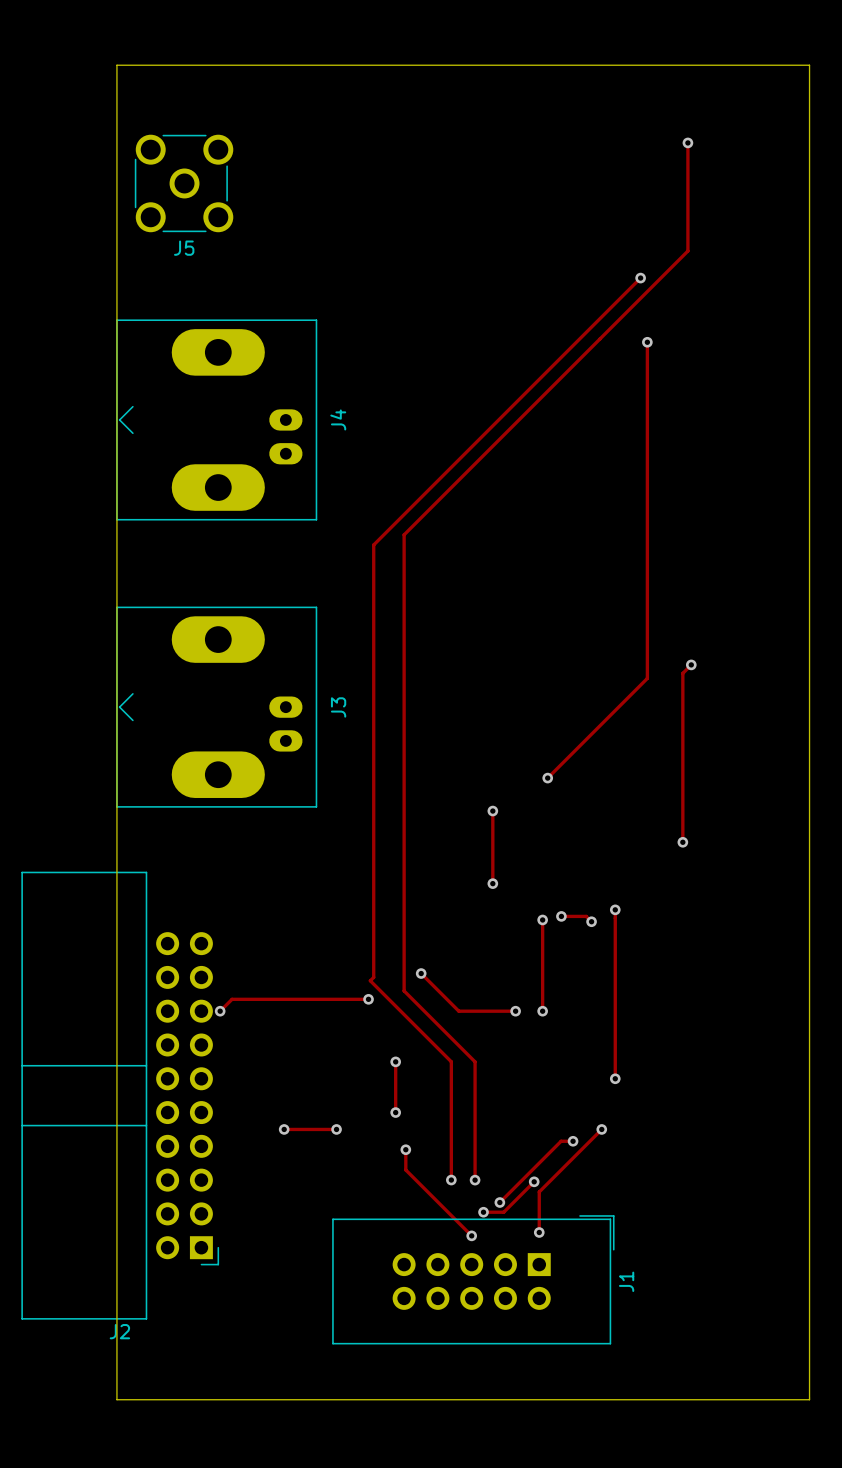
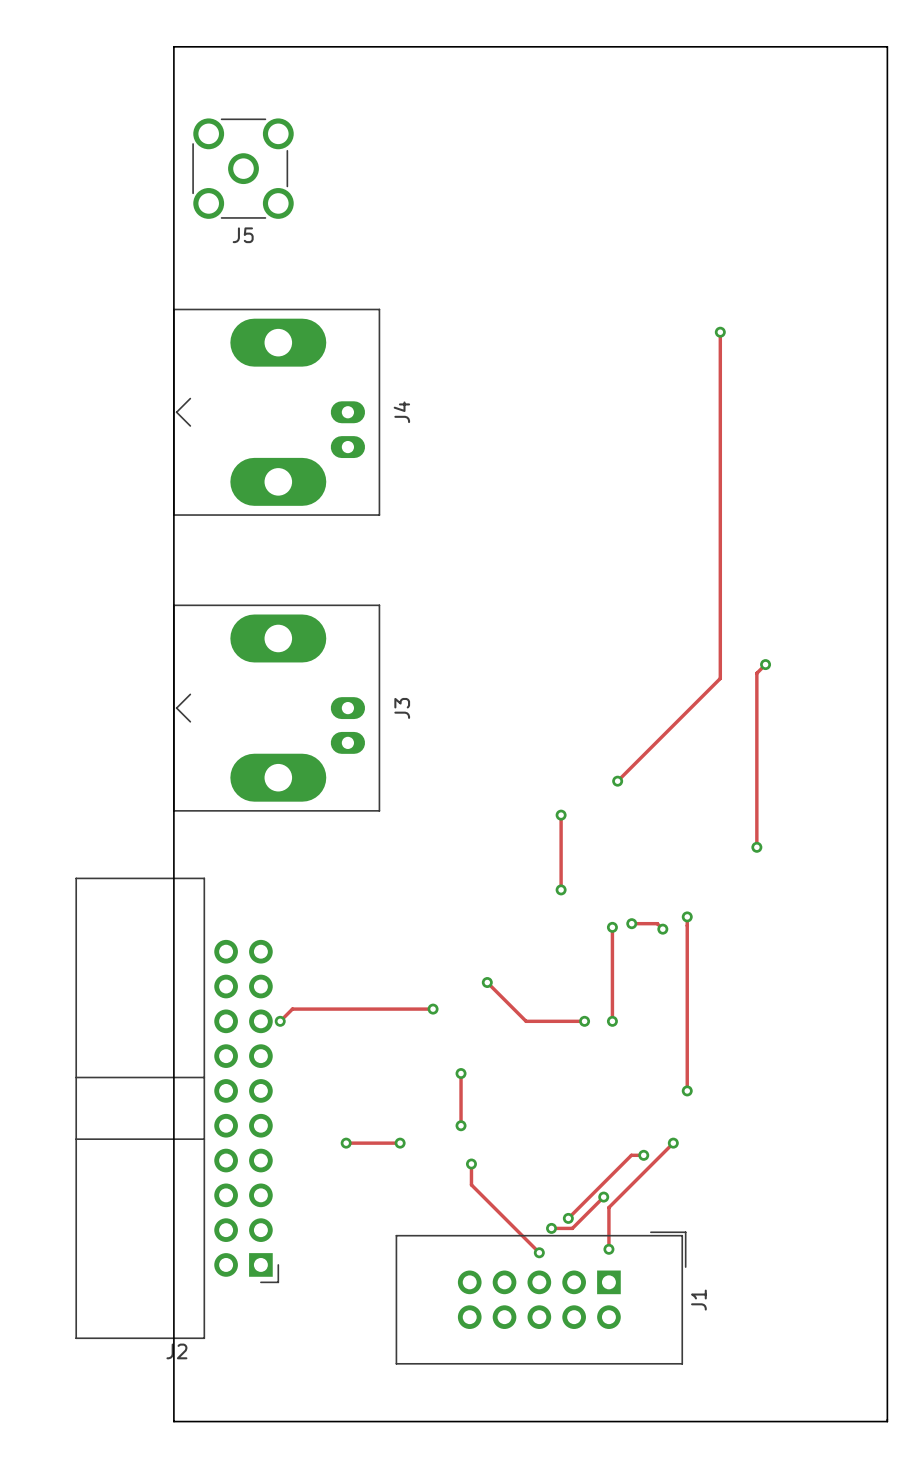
track: (687, 142) (687, 251) (404, 534) (404, 990) (475, 1061) (475, 1180) -> none
via: (687, 142) -> none
track: (640, 278) (373, 544) (373, 977) (370, 980) (451, 1061) (451, 1180) -> none
via: (640, 278) -> none
via: (451, 1180) -> none
via: (475, 1180) -> none

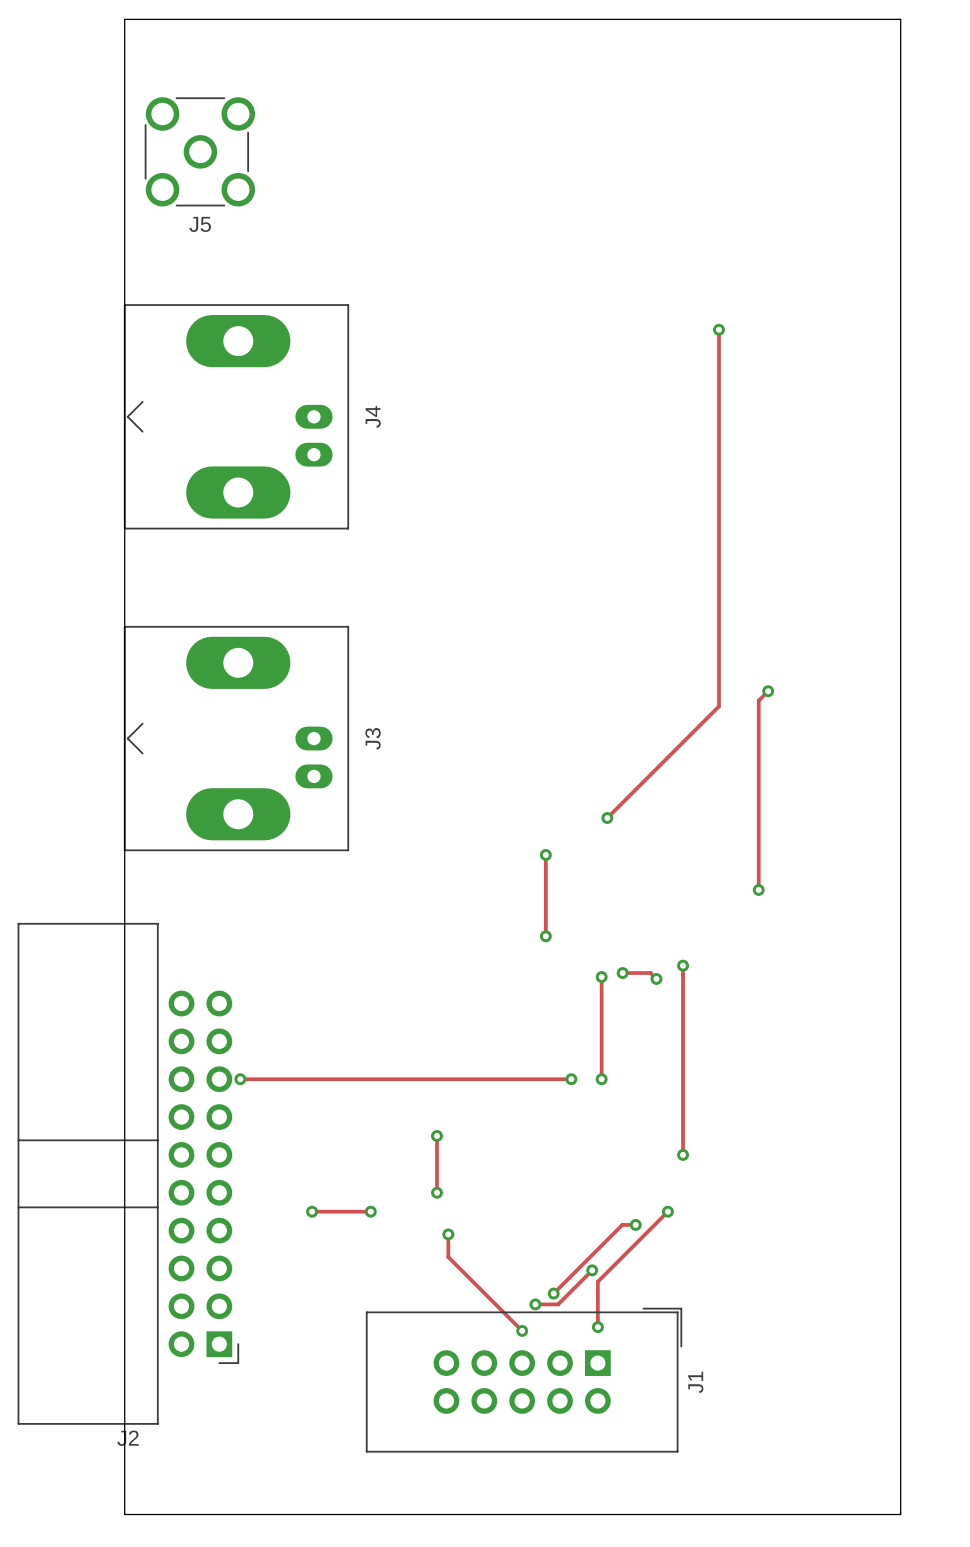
track: (487, 982) (526, 1021) -> none
via: (487, 982) -> none
track: (433, 1009) (292, 1009) (280, 1021) -> (507, 1079) (240, 1079)
via: (433, 1009) -> none

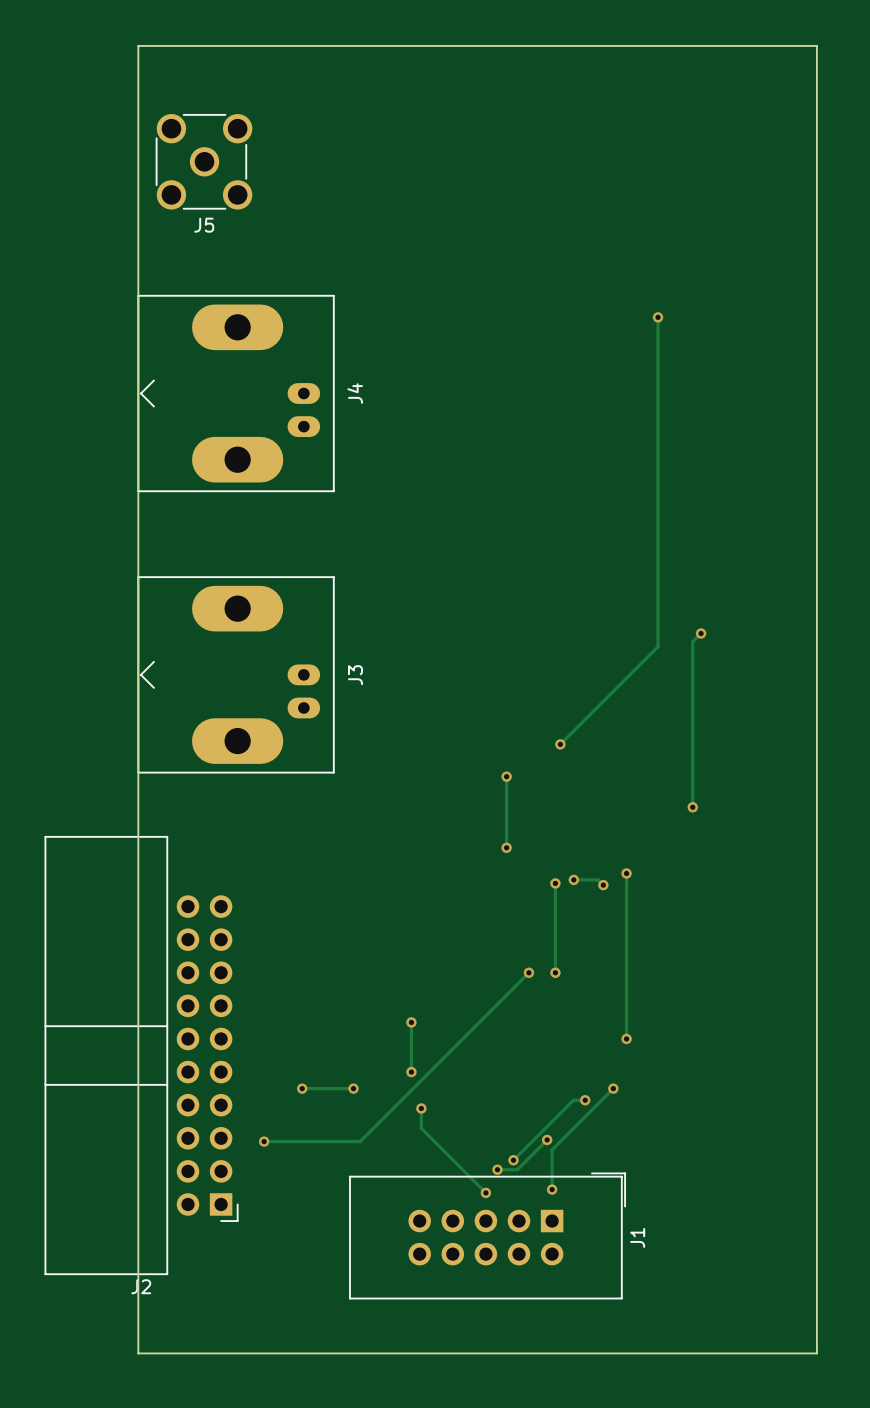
track: (240, 1079) (571, 1079) -> (264, 1141) (360, 1141) (528, 972)
via: (240, 1079) -> none
via: none -> (264, 1141)

